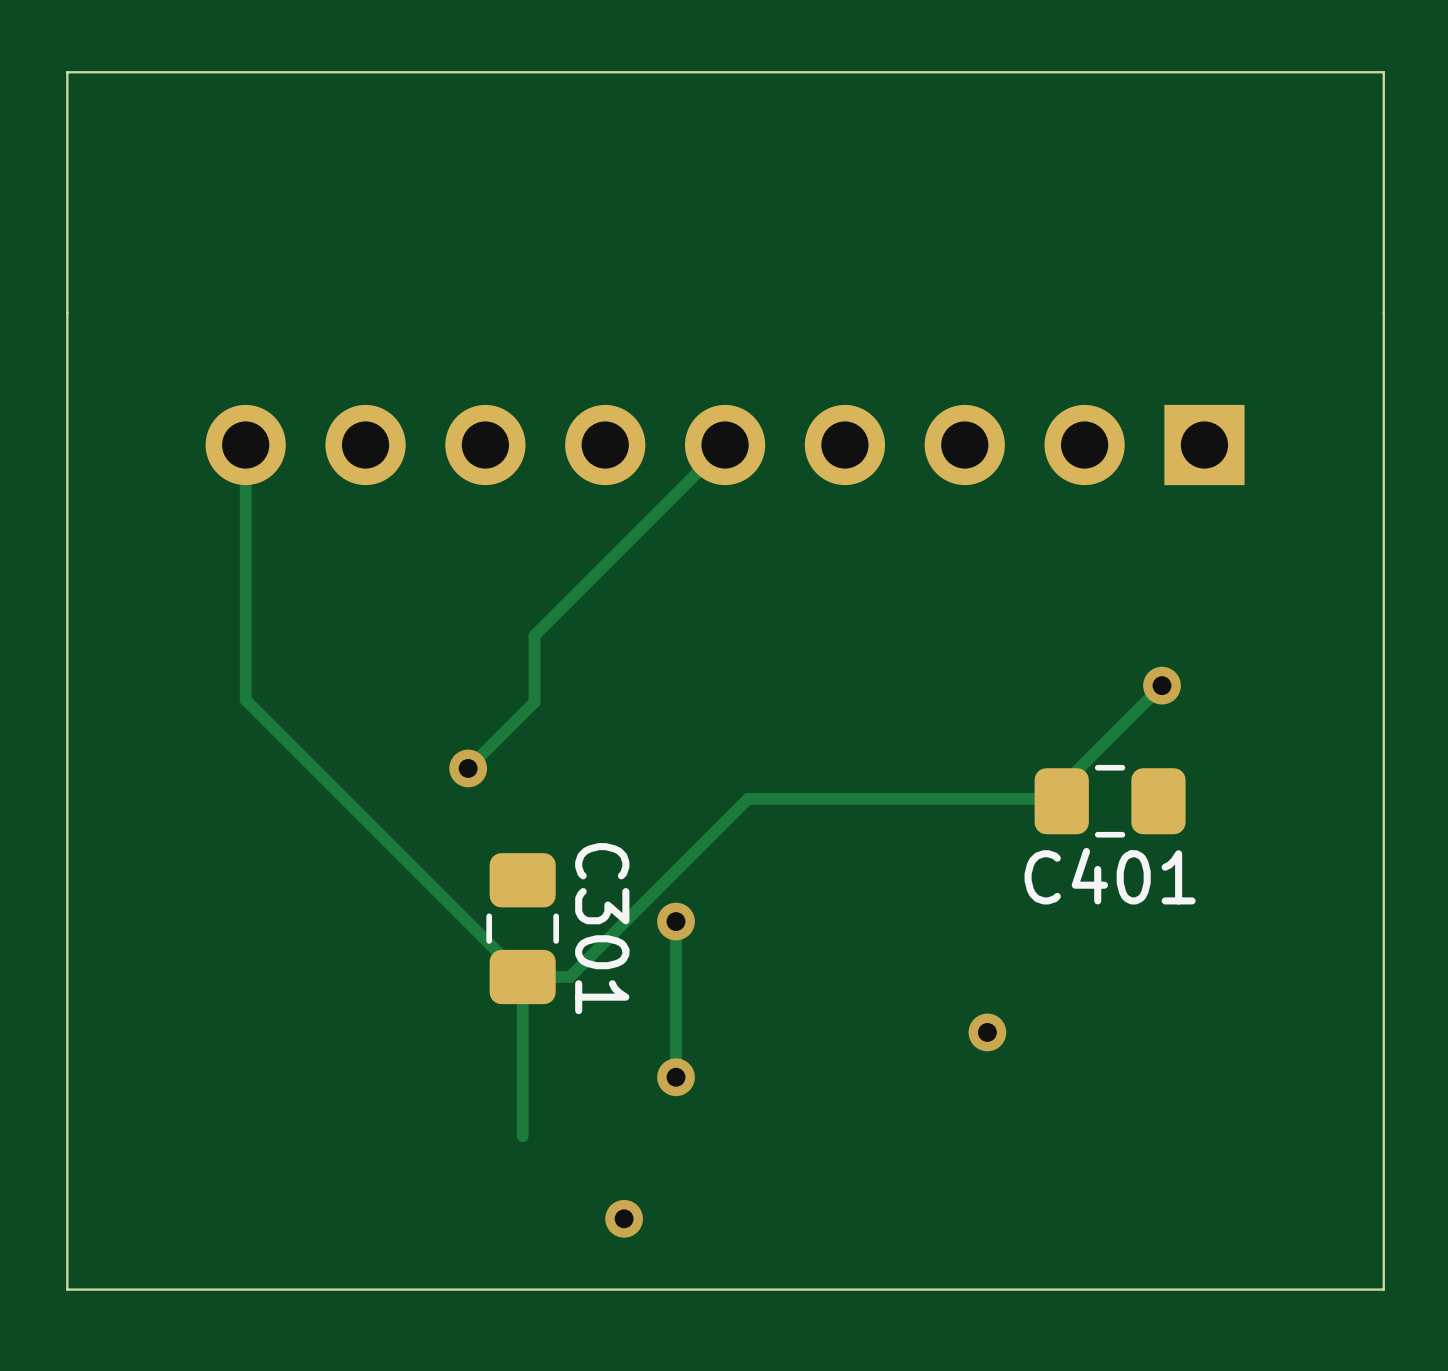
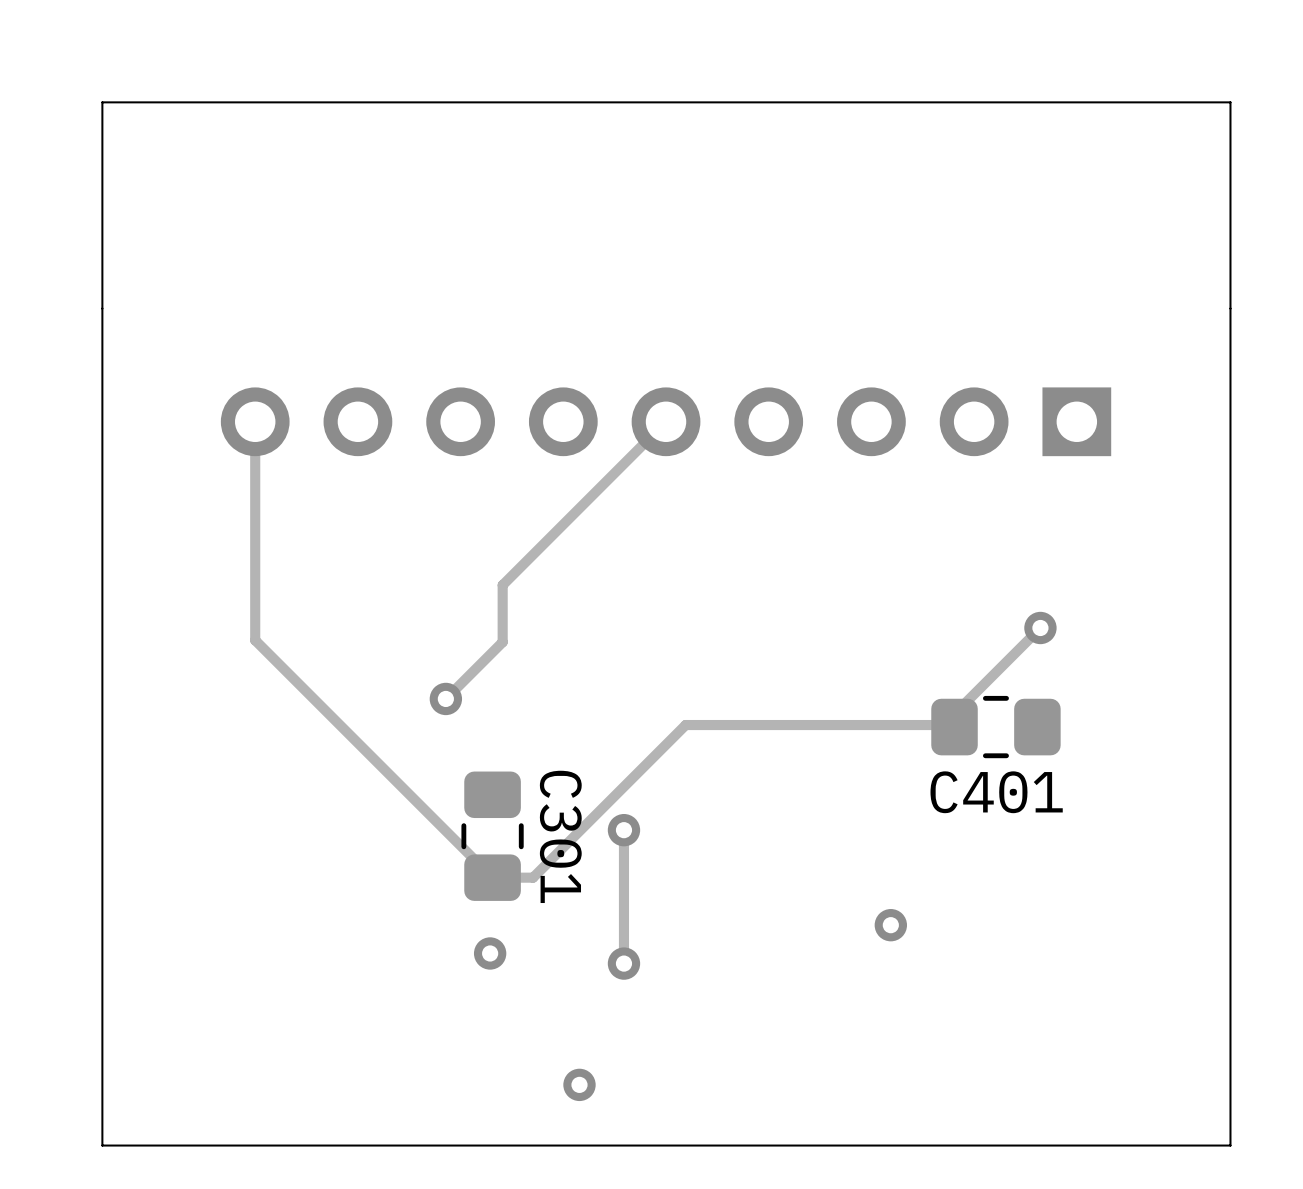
track: (522, 977) (522, 1136) -> none
via: none -> (490, 953)

